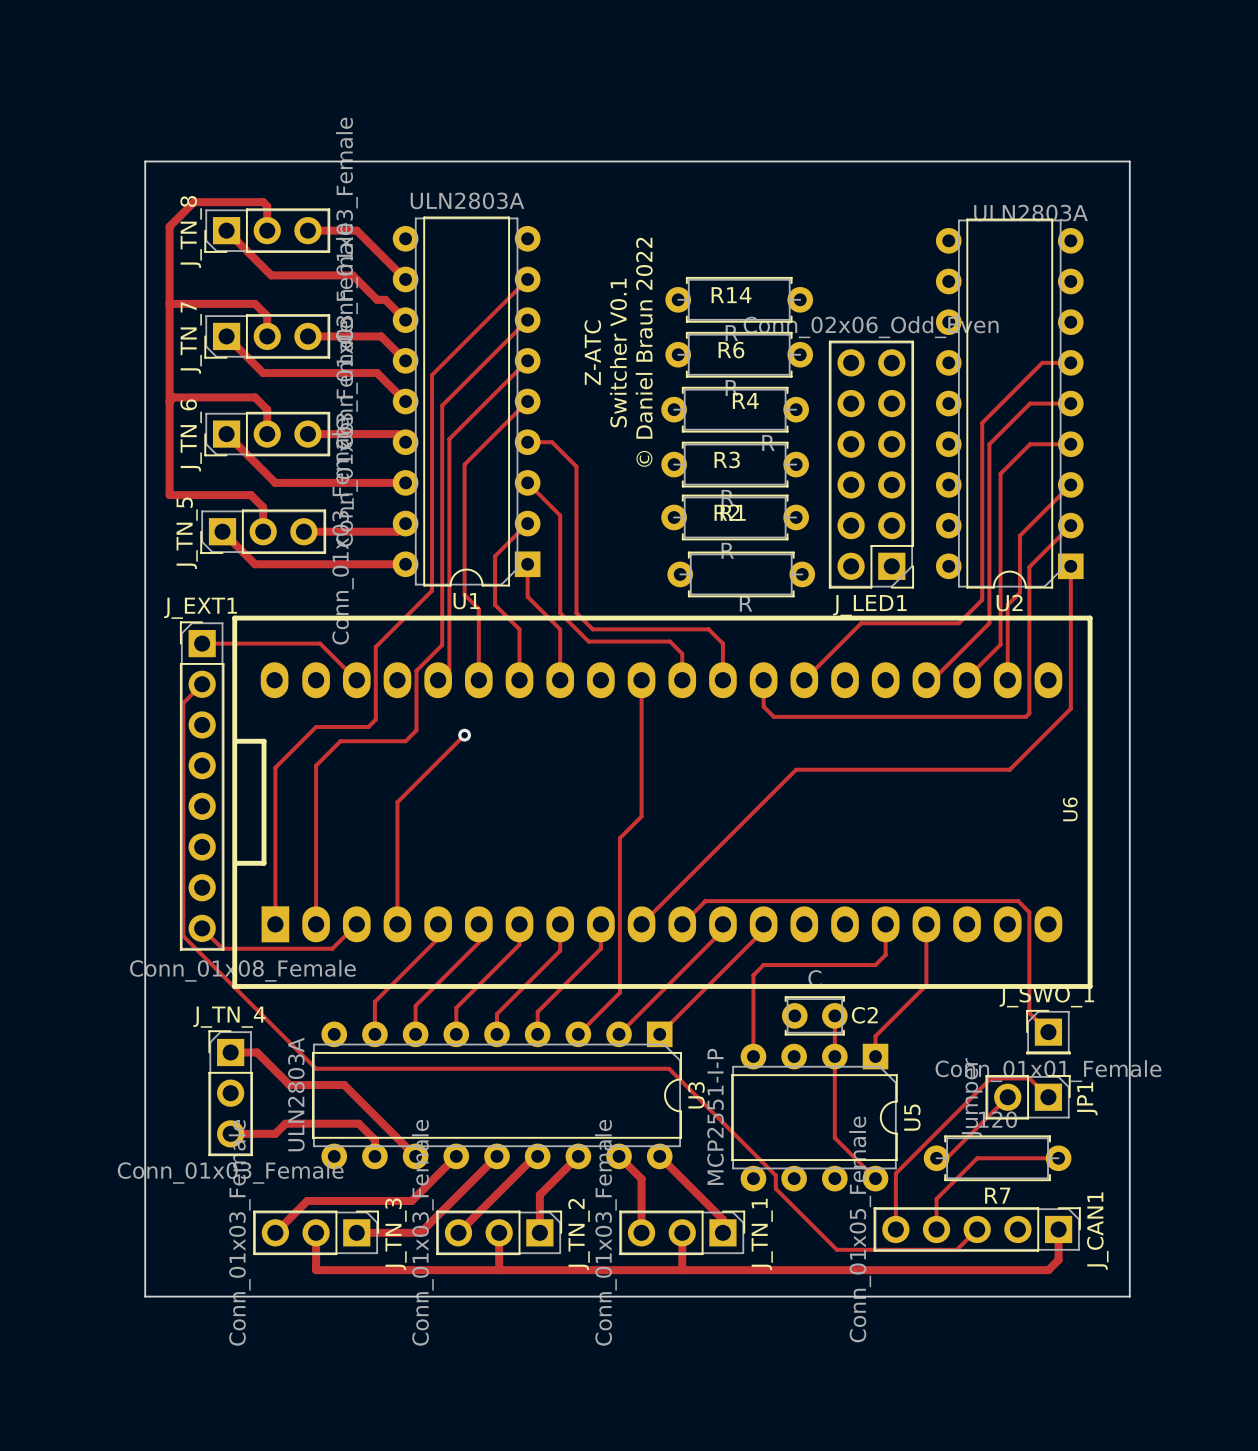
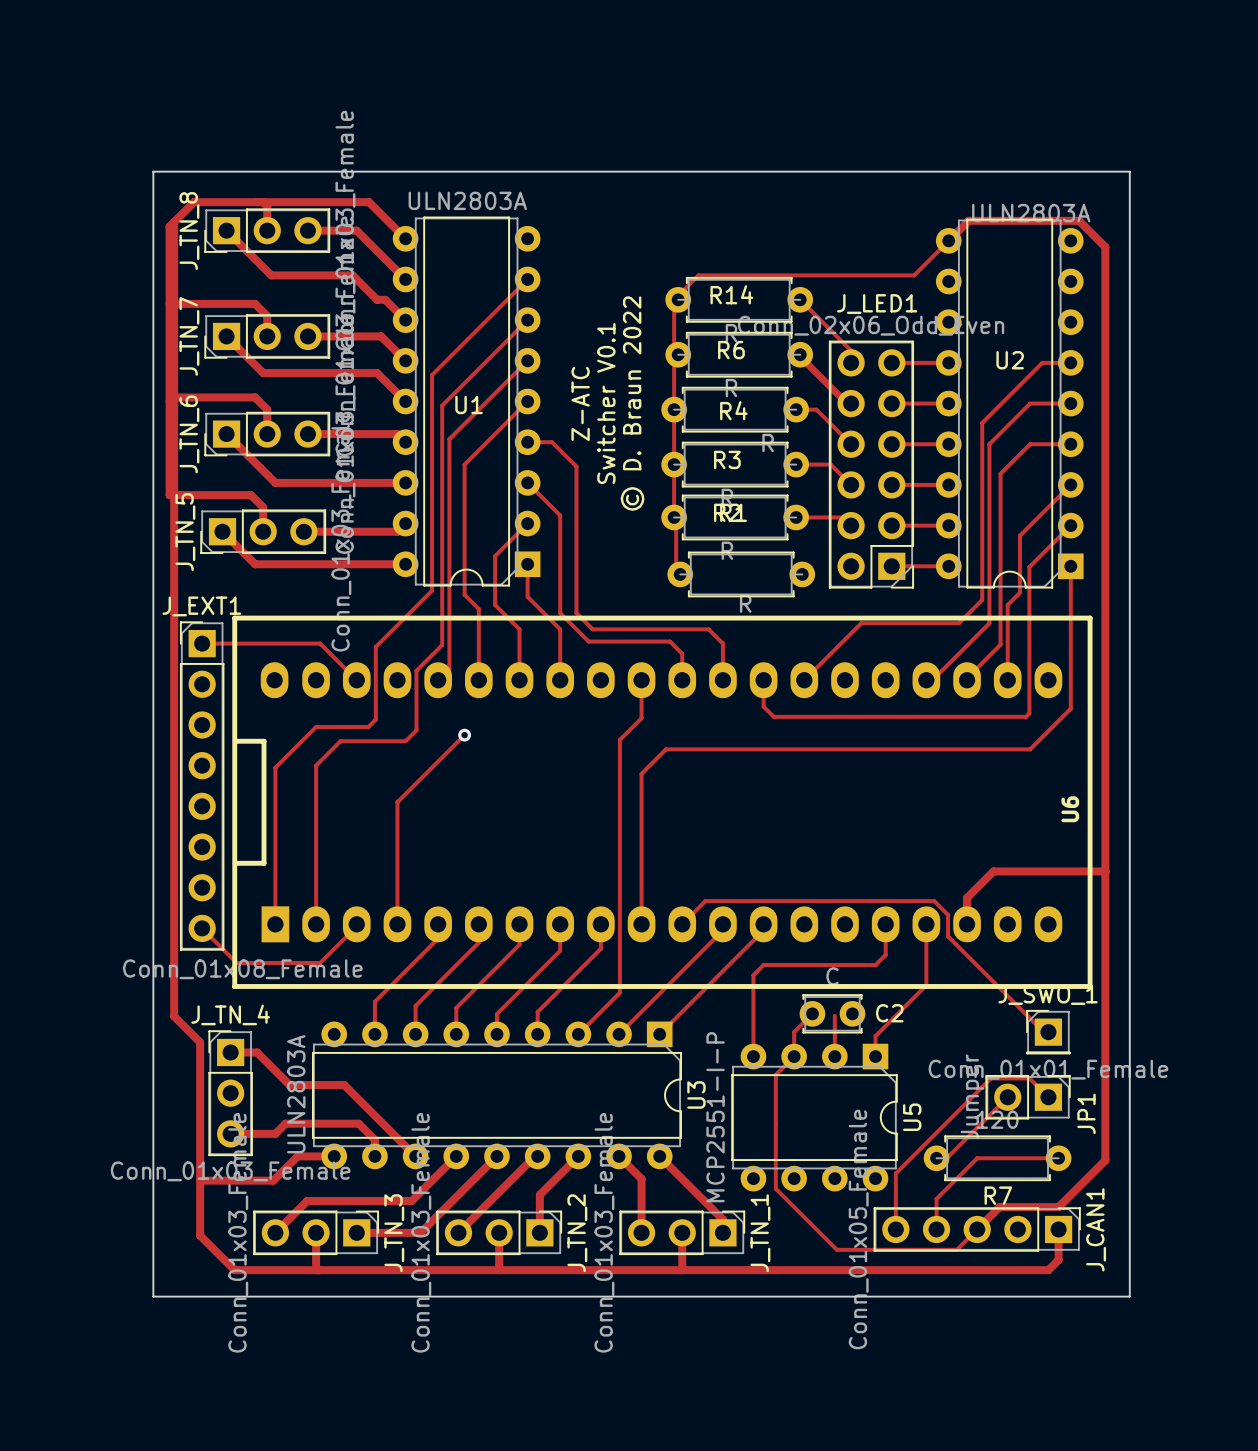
board edge: (1129, 171) (1129, 161) (145, 161) (145, 1296) (153, 1296) -> (1129, 171) (153, 171) (153, 1296)
track: none -> (263, 202) (368, 202) (405, 238)
track: none -> (174, 222) (174, 1016) (200, 1042) (200, 1235) (234, 1270) (316, 1270)
track: none -> (796, 299) (800, 299) (851, 350) (851, 362)
text position: Z-ATC (592, 352) -> Z-ATC (580, 403)
text position: Switcher V0.1 (618, 352) -> Switcher V0.1 (606, 403)
text: © Daniel Braun 2022 (644, 352) -> © D. Braun 2022 (632, 403)
track: none -> (796, 354) (845, 403) (851, 403)
track: none -> (800, 354) (849, 403)
track: none -> (891, 362) (948, 362)
R4 name position: R4 (745, 400) -> R4 (733, 410)
track: none -> (891, 403) (948, 403)
track: none -> (796, 409) (816, 409) (851, 444)
track: none -> (891, 444) (948, 444)
track: none -> (796, 464) (830, 464) (851, 484)
track: none -> (891, 484) (948, 484)
track: none -> (796, 517) (842, 517) (851, 525)
track: none -> (891, 525) (948, 525)
track: none -> (891, 566) (948, 566)
track: none -> (676, 574) (676, 519) (674, 517) (674, 299) (698, 275) (914, 275) (968, 220) (1079, 220) (1105, 247) (1105, 1160) (1058, 1207) (999, 1207) (977, 1229)
U1 name position: U1 (466, 601) -> U1 (469, 405)
U2 name position: U2 (1009, 603) -> U2 (1010, 360)
J_LED1 name position: J_LED1 (869, 605) -> J_LED1 (877, 304)
track: (202, 684) (183, 703) (183, 936) (297, 1050) -> none
track: (641, 718) (641, 773) -> (641, 718) (619, 739) (619, 838)
track: (1030, 749) (1009, 769) (796, 769) (641, 924) -> (1030, 749) (665, 749) (641, 773)
track: (641, 816) (619, 838) -> (641, 816) (641, 924)
track: none -> (1105, 871) (993, 871) (967, 897) (967, 924)
track: (934, 901) (1018, 901) (1029, 912) (1029, 1013) (1048, 1032) -> (934, 901) (948, 914) (948, 936) (1043, 1032) (1048, 1032)
track: (356, 924) (332, 948) (222, 948) -> (356, 924) (320, 962) (236, 962) (222, 948)
C2 position: (814, 1015) -> (832, 1013)
C2 name position: C2 (864, 1015) -> C2 (889, 1013)
track: (297, 1050) (316, 1068) (669, 1068) (775, 1175) -> (812, 1013) (794, 1032) (794, 1056) (775, 1074) (775, 1175)
track: (834, 1056) (834, 1137) (875, 1178) -> none
JP1 name position: JP1 (1087, 1098) -> JP1 (1086, 1113)
track: none -> (334, 1156) (297, 1156) (273, 1180) (200, 1180)

